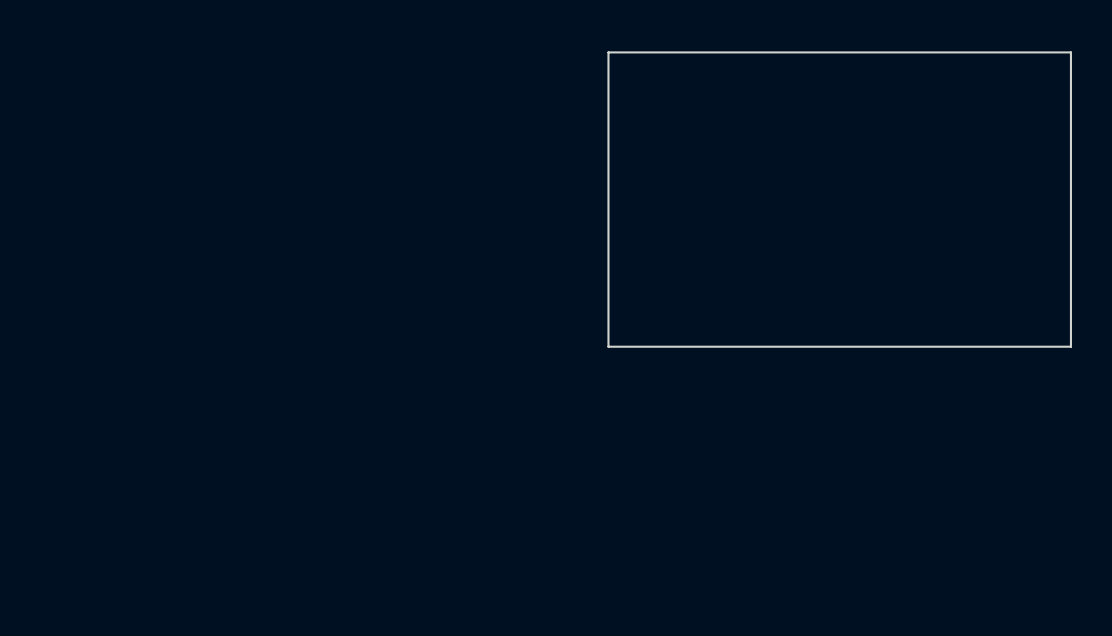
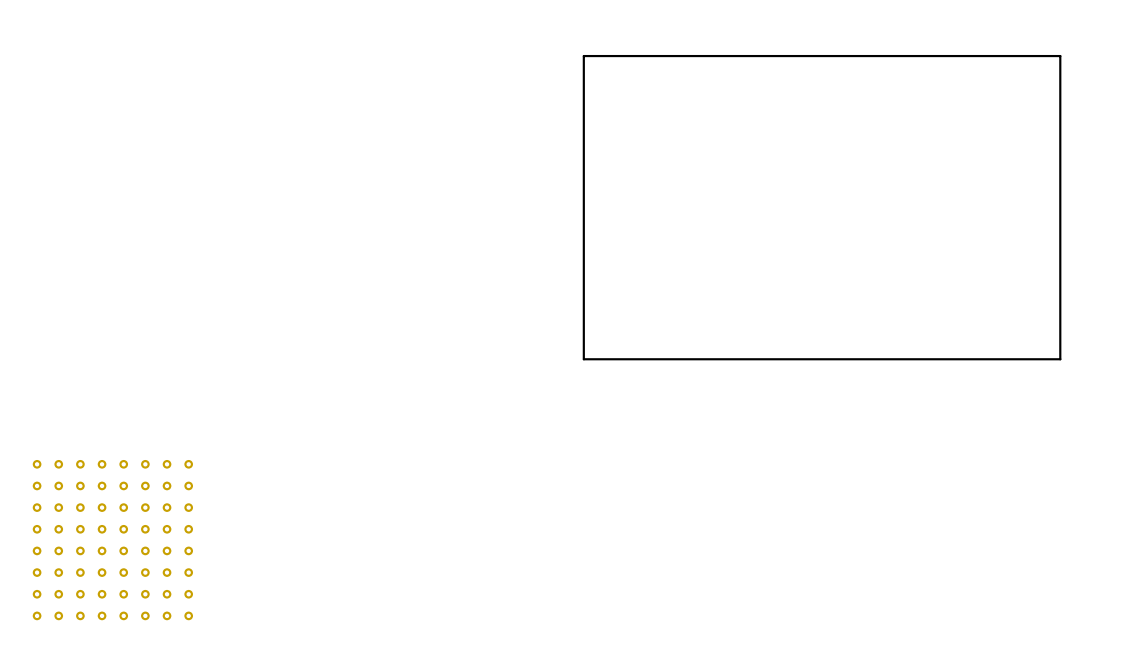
part: none -> (112, 540)

